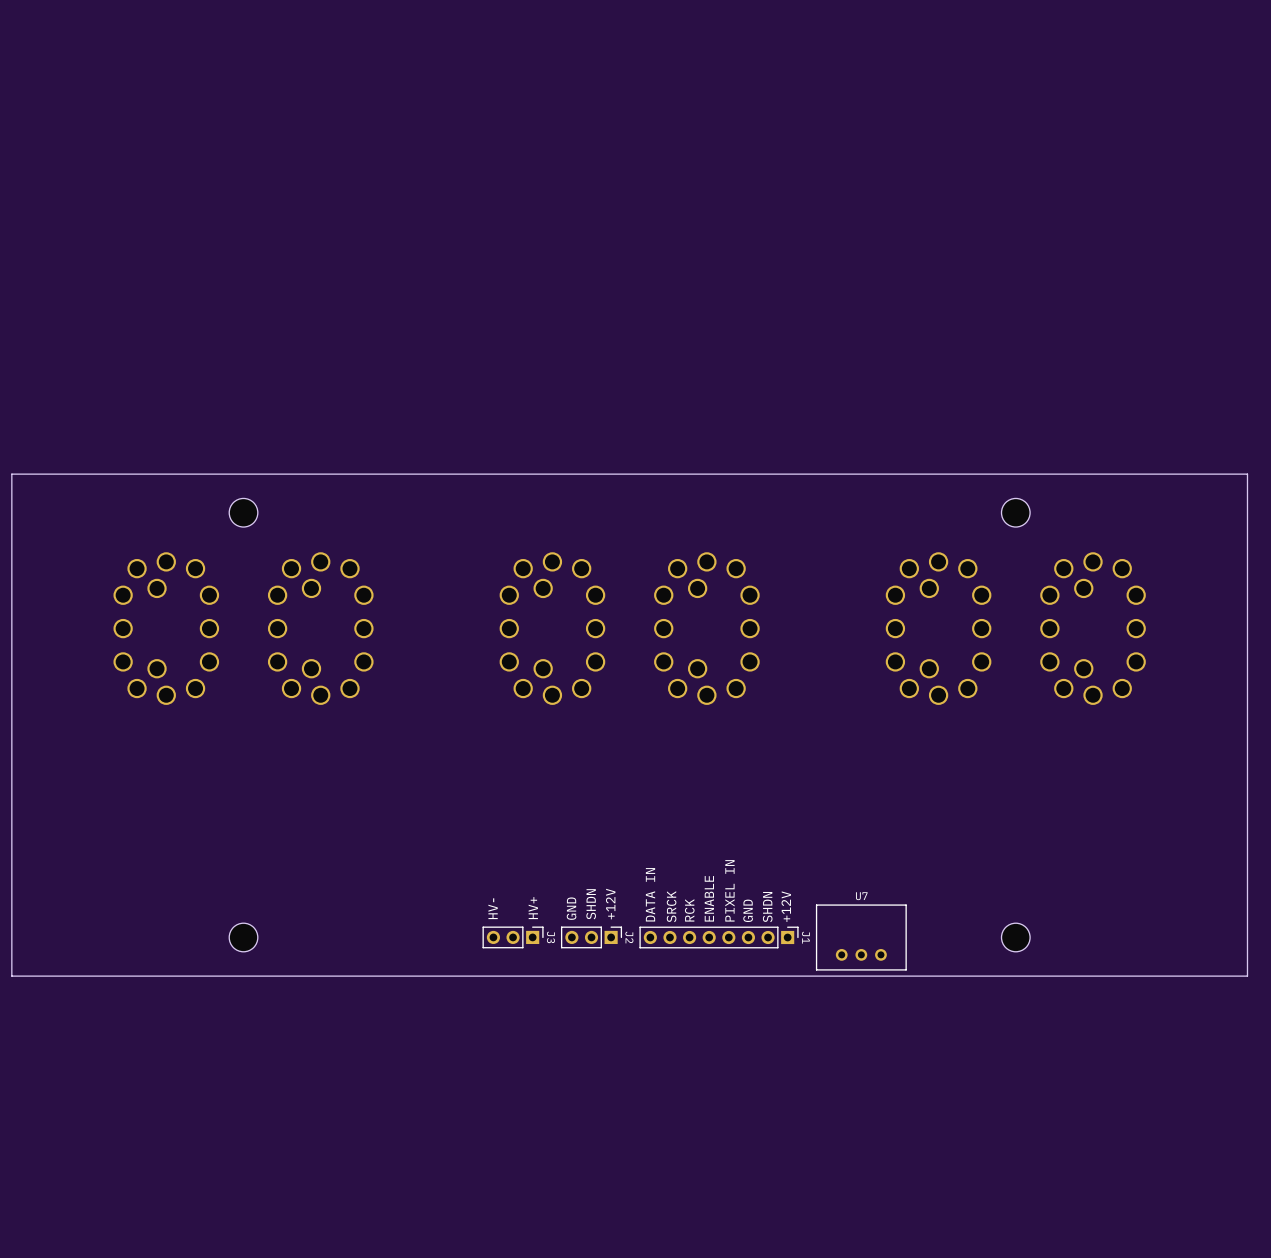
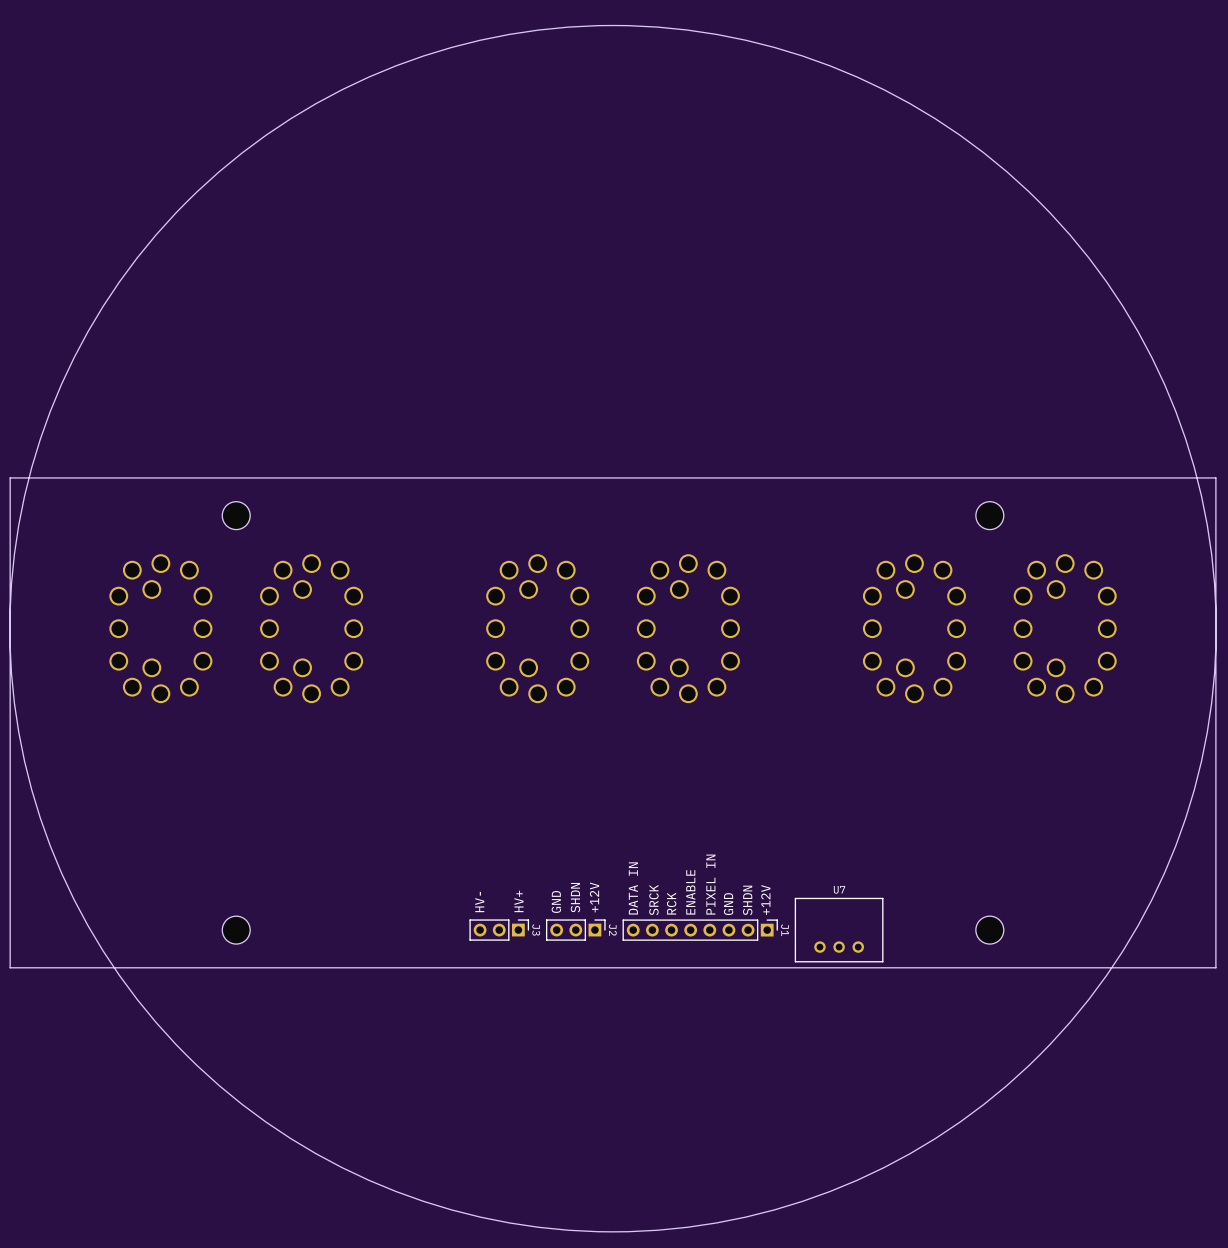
round board edge: none -> [9, 24, 1217, 1233]

